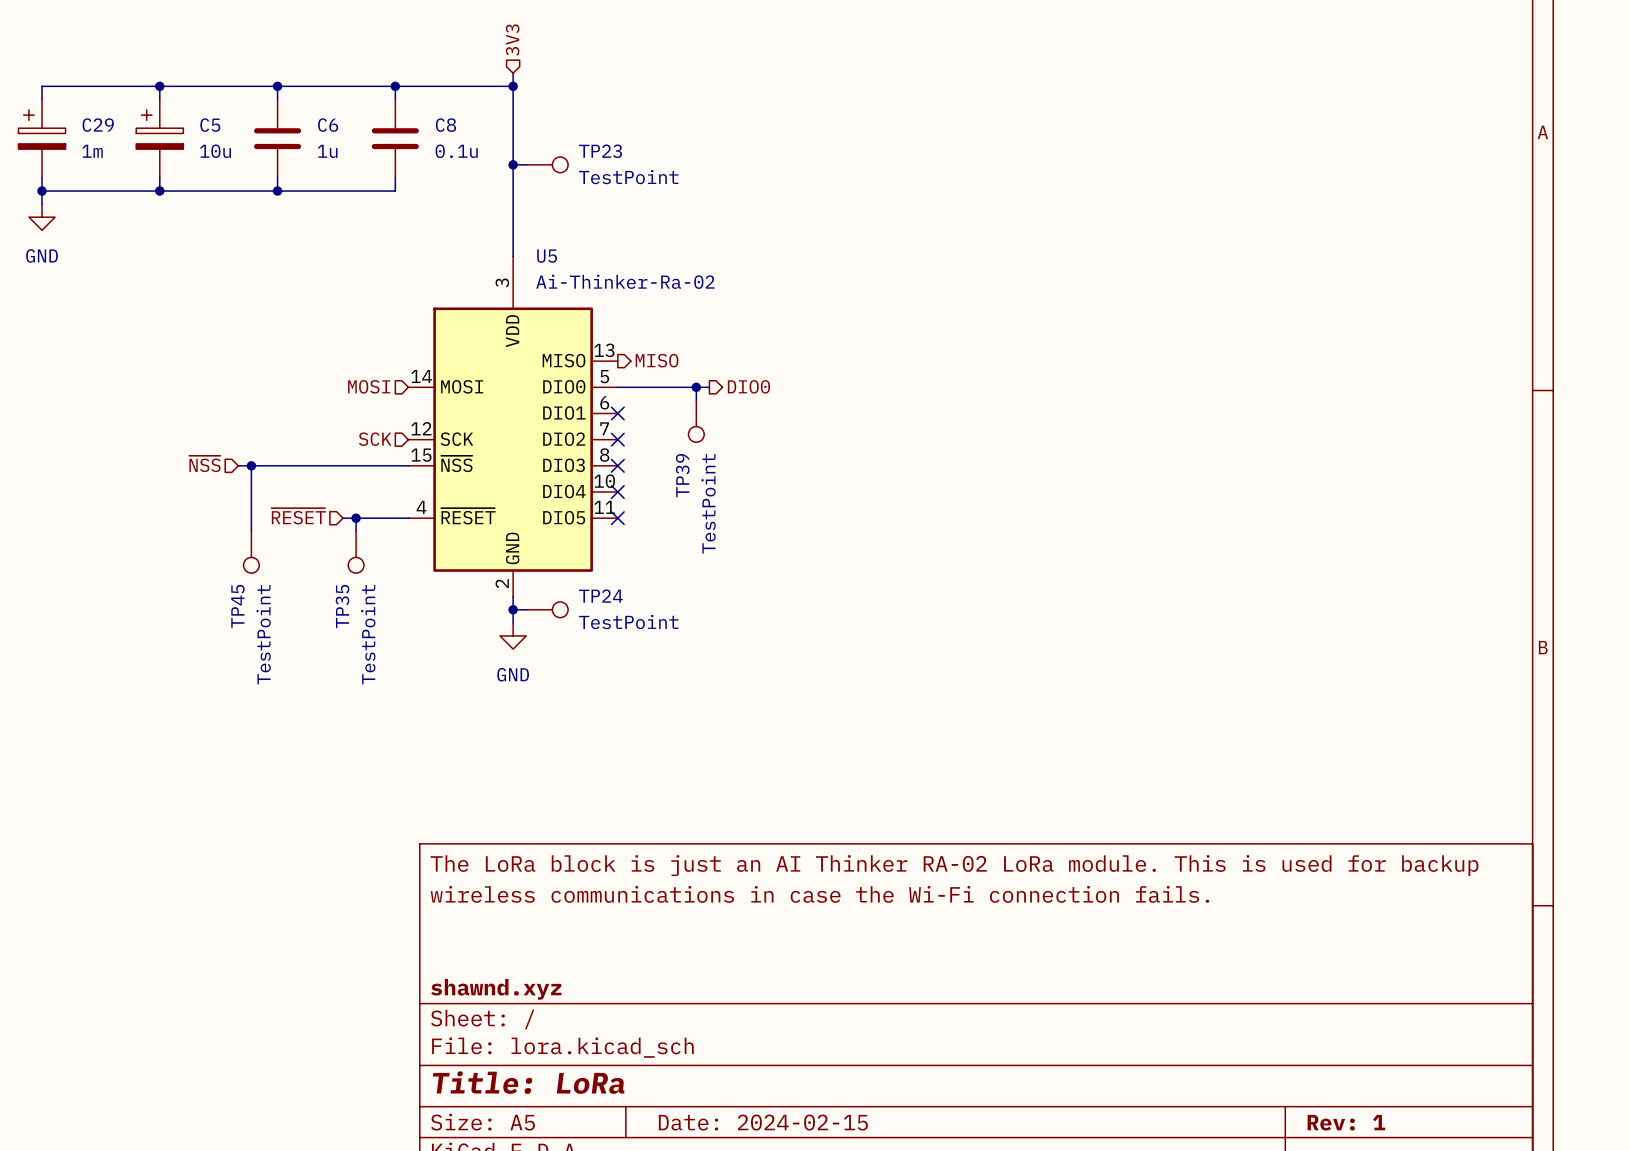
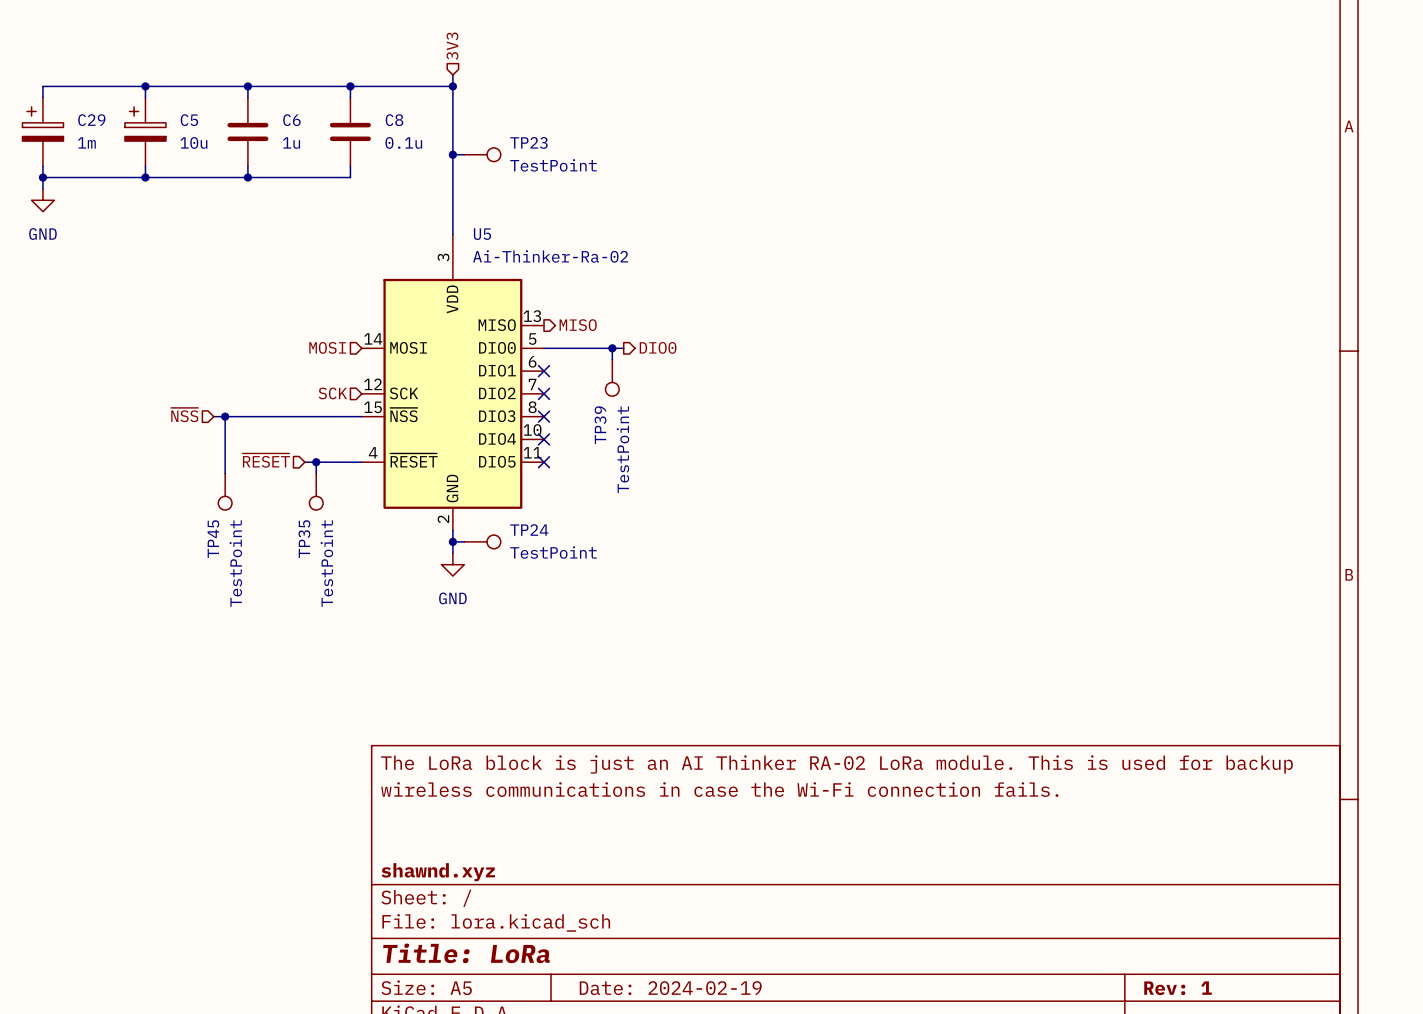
title block: Date: 2024-02-15 (763, 1122) -> Date: 2024-02-19 (670, 988)

